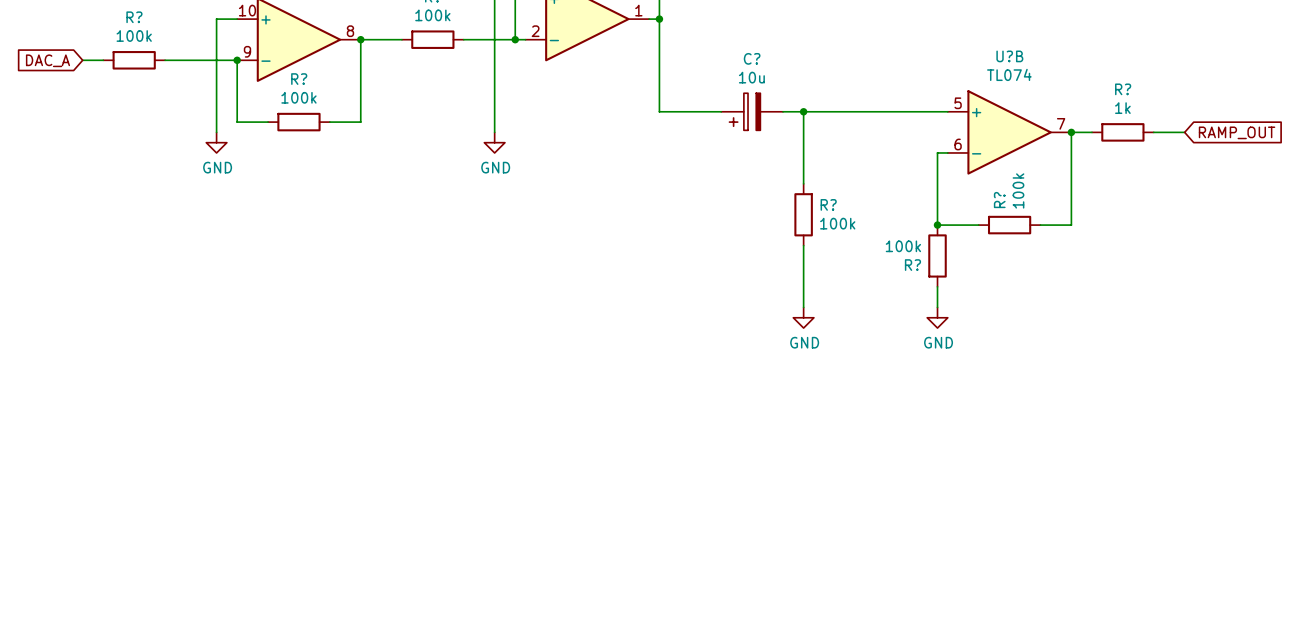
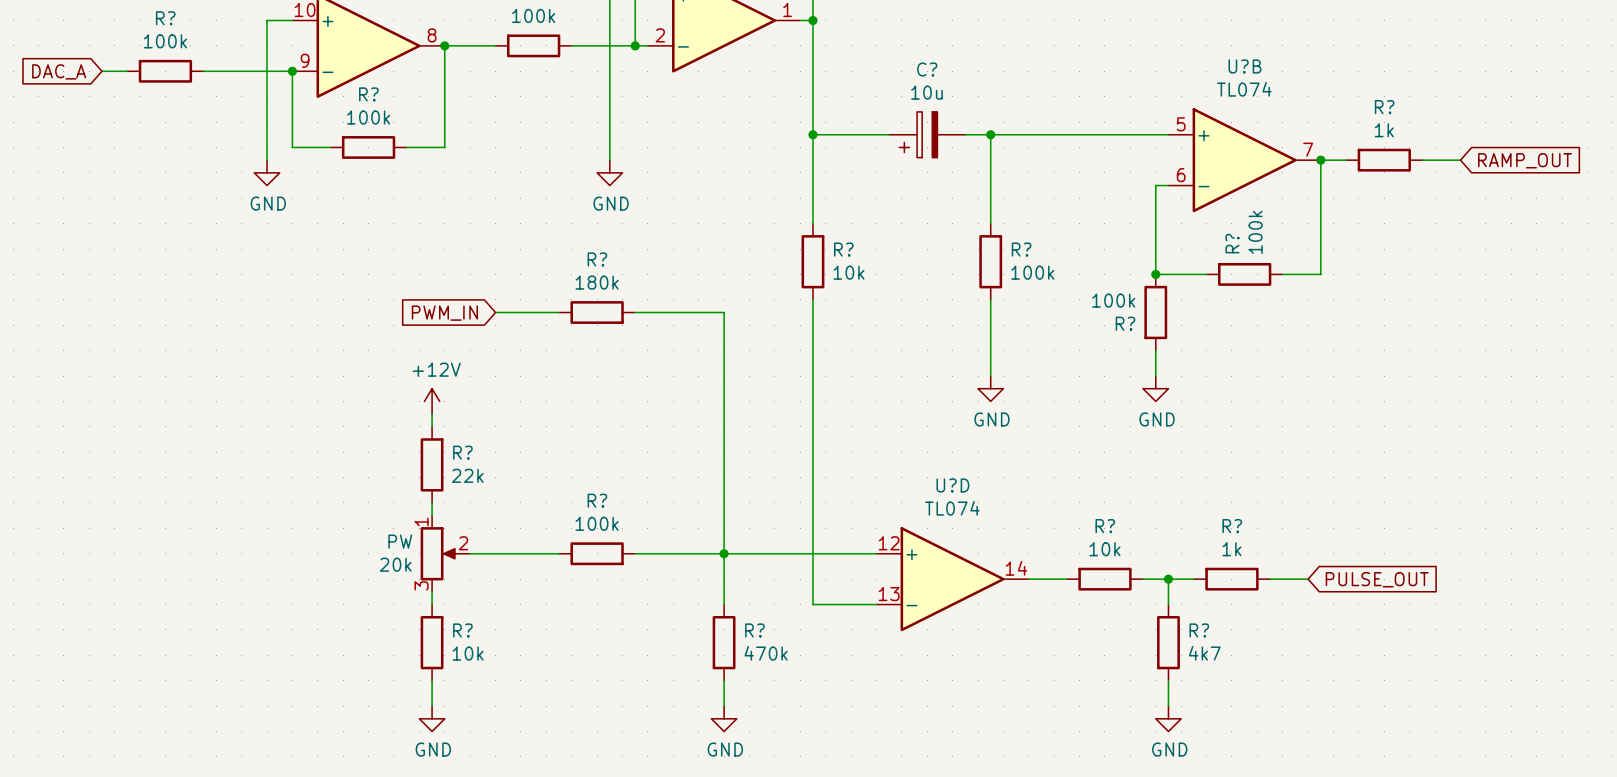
wire: none -> (812, 134) (812, 223)
junction: none -> (812, 134)
R?: none -> 10k (812, 261)
wire: none -> (812, 299) (812, 604) (876, 604)
wire: none -> (495, 312) (559, 312)
R?: none -> 180k (597, 312)
wire: none -> (635, 312) (724, 312) (724, 604)
global label: none -> PWM_IN (444, 313)
power symbol: none -> +12V (432, 401)
wire: none -> (432, 414) (432, 426)
R?: none -> 22k (432, 464)
wire: none -> (432, 502) (432, 515)
PW: none -> 20k (445, 553)
wire: none -> (470, 553) (559, 553)
R?: none -> 100k (597, 553)
wire: none -> (635, 553) (876, 553)
junction: none -> (724, 553)
U?D: none -> TL074 (952, 579)
wire: none -> (1028, 579) (1066, 579)
R?: none -> 10k (1104, 579)
wire: none -> (1143, 579) (1193, 579)
wire: none -> (1168, 579) (1168, 604)
junction: none -> (1168, 579)
R?: none -> 1k (1231, 579)
wire: none -> (1270, 579) (1308, 579)
global label: none -> PULSE_OUT (1377, 579)
wire: none -> (432, 591) (432, 604)
R?: none -> 10k (432, 642)
R?: none -> 470k (724, 642)
R?: none -> 4k7 (1168, 642)
wire: none -> (432, 680) (432, 706)
wire: none -> (724, 680) (724, 706)
wire: none -> (1168, 680) (1168, 706)
power symbol: none -> GND (432, 718)
power symbol: none -> GND (724, 718)
power symbol: none -> GND (1168, 718)

